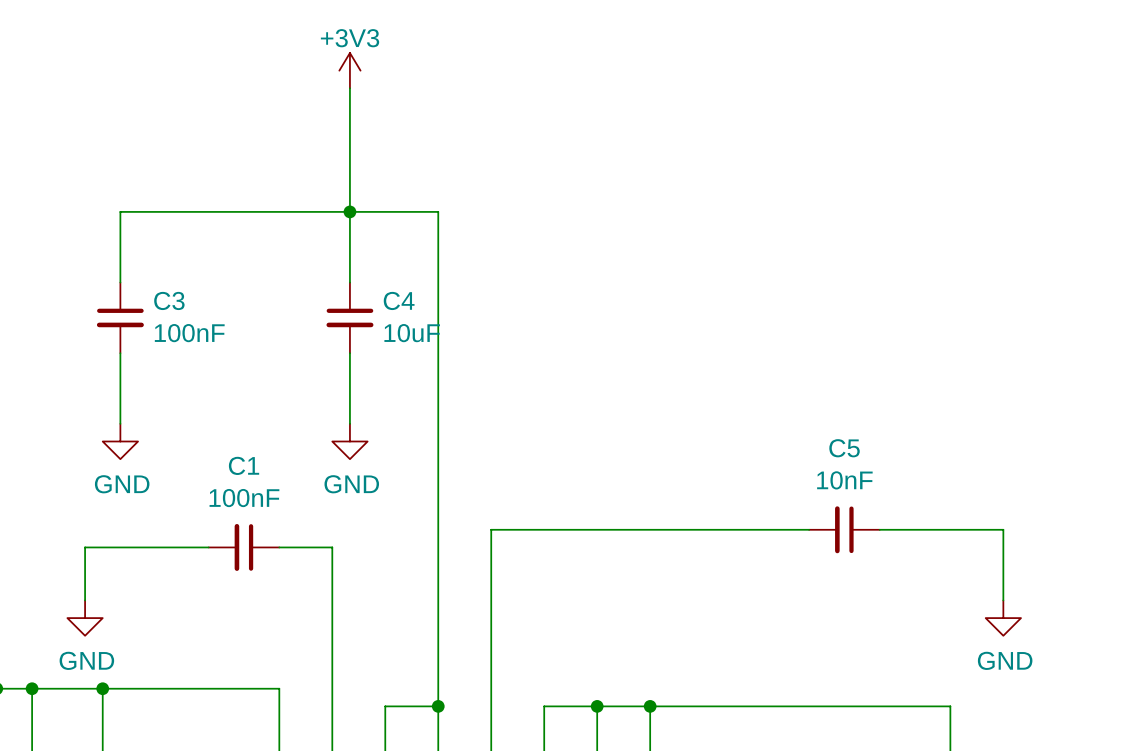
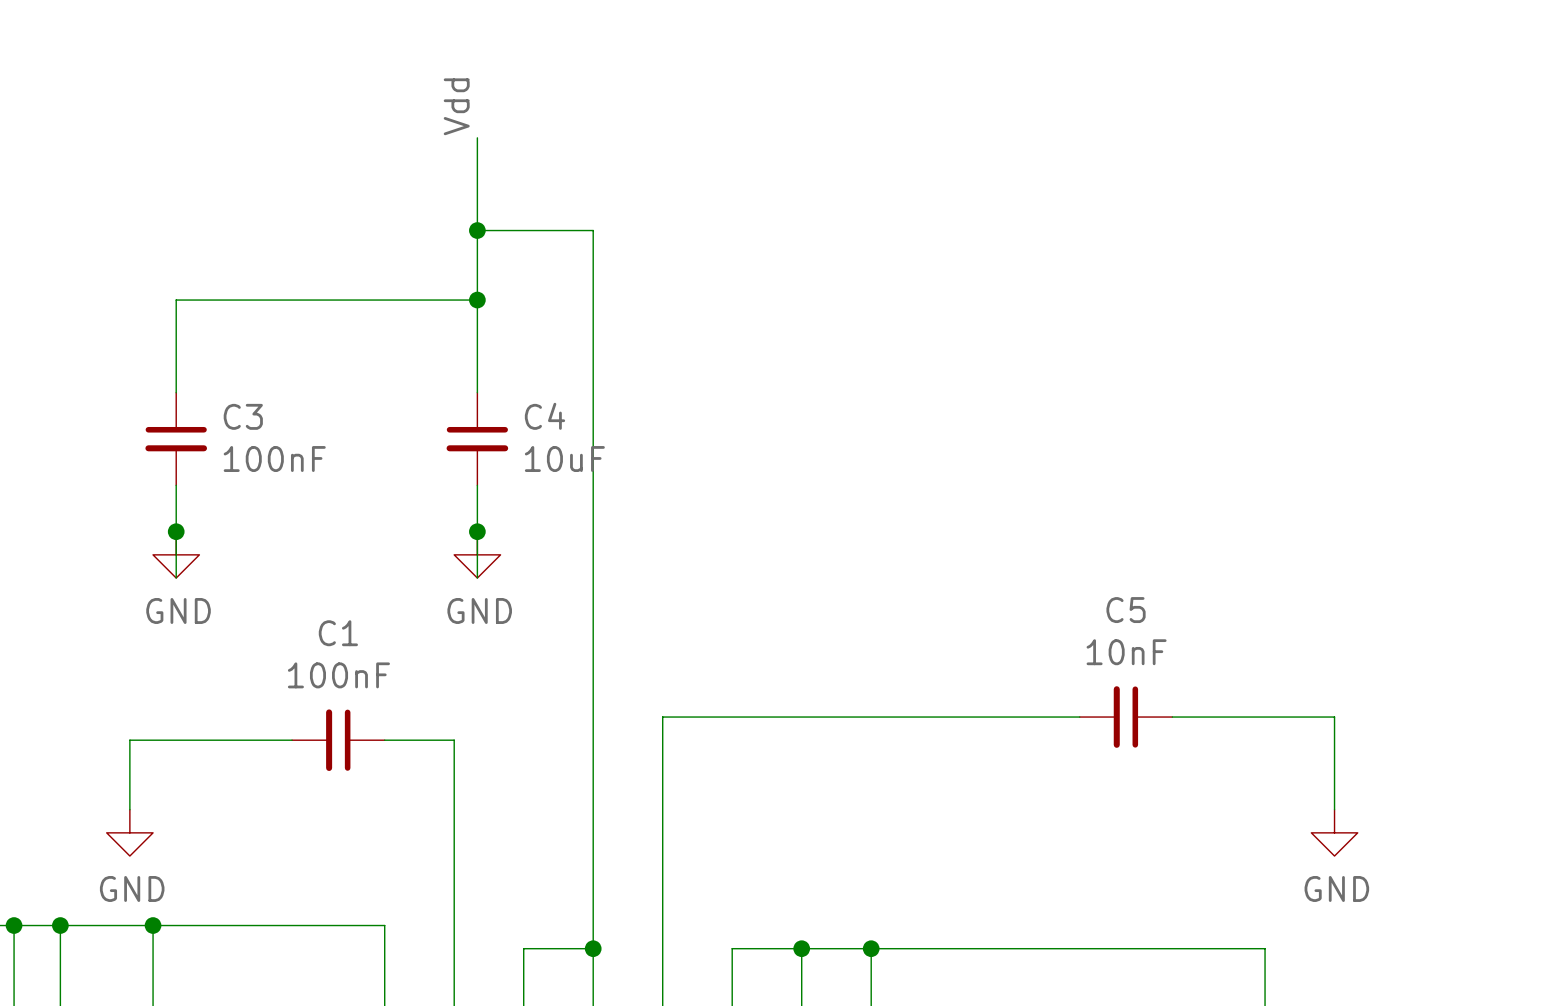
label: none -> Vdd (456, 106)
power symbol: +3V3 (349, 70) -> none
junction: none -> (477, 230)
wire: (349, 211) (438, 211) -> (477, 230) (593, 230) (593, 300)
junction: none -> (176, 531)
junction: none -> (477, 531)
power symbol position: GND (120, 441) -> GND (176, 554)
power symbol position: GND (349, 441) -> GND (477, 554)

